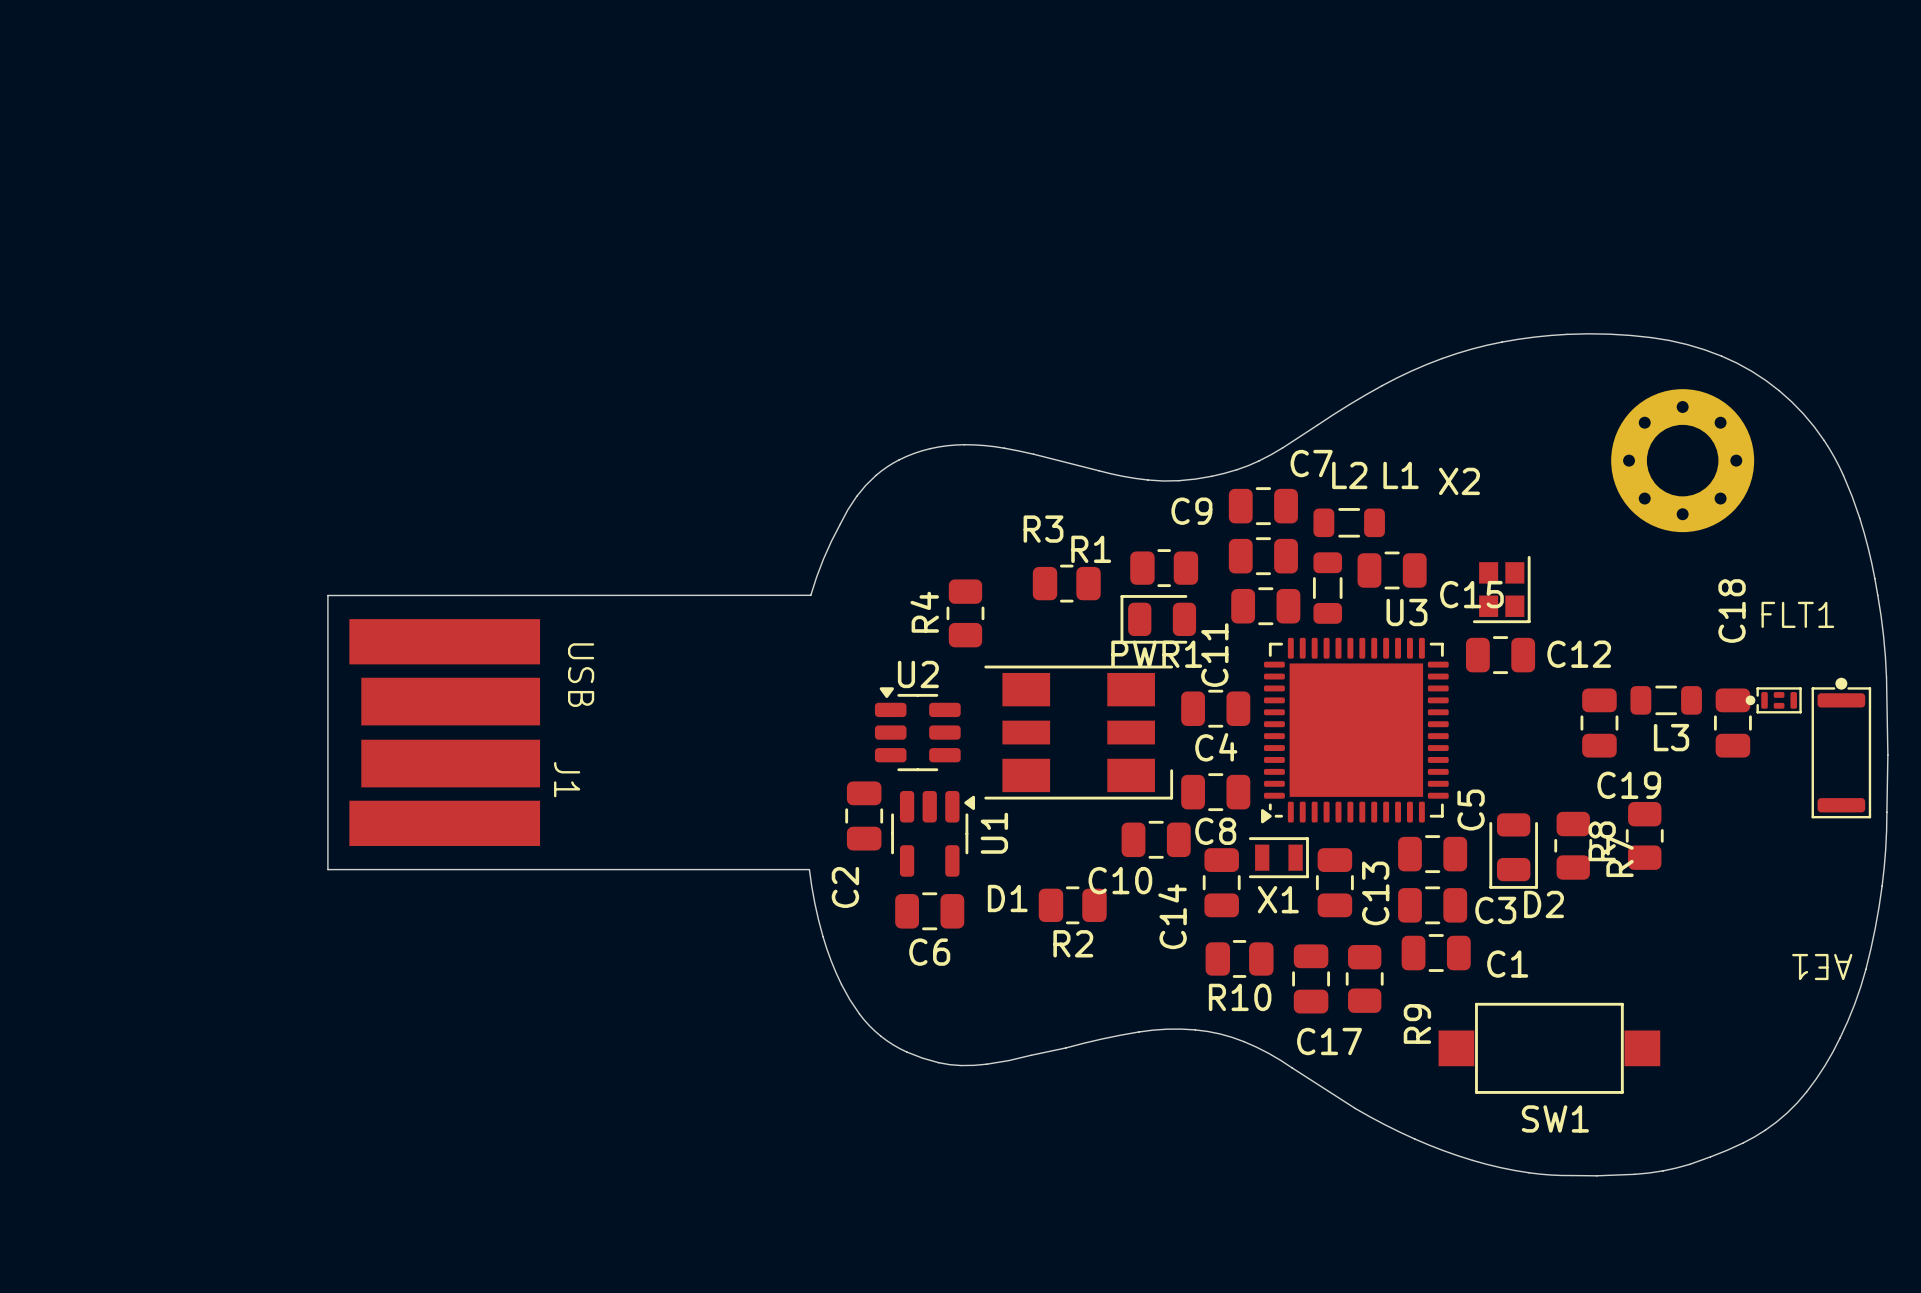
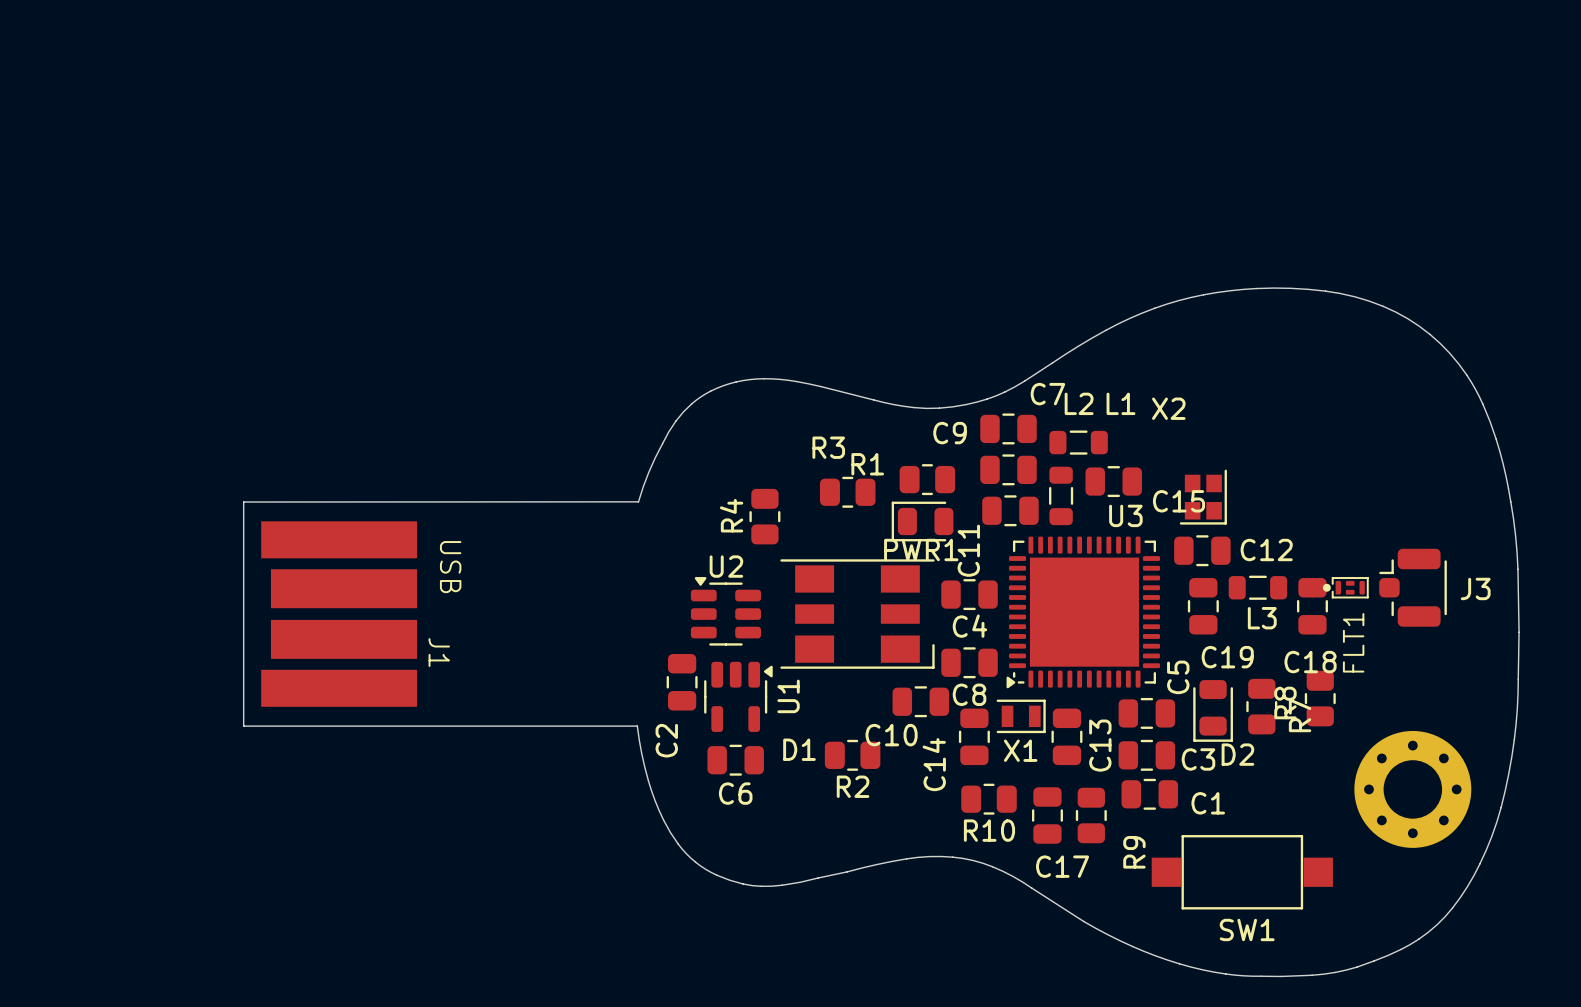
part position: (1682, 460) -> (1412, 789)
C18 name rotation: 0° (1732, 611) -> 90° clockwise (1310, 662)
C18 name position: C18 (1732, 611) -> C18 (1310, 662)
FLT1 name rotation: 0° (1797, 614) -> 90° counterclockwise (1353, 642)
FLT1 name position: FLT1 (1797, 614) -> FLT1 (1353, 642)
L3 position: (1666, 700) -> (1257, 587)
J3: none -> (1413, 587)
FLT1 position: (1773, 700) -> (1345, 587)
C19 position: (1599, 723) -> (1203, 606)
C18 position: (1732, 723) -> (1312, 606)
AE1: (1841, 748) -> none

